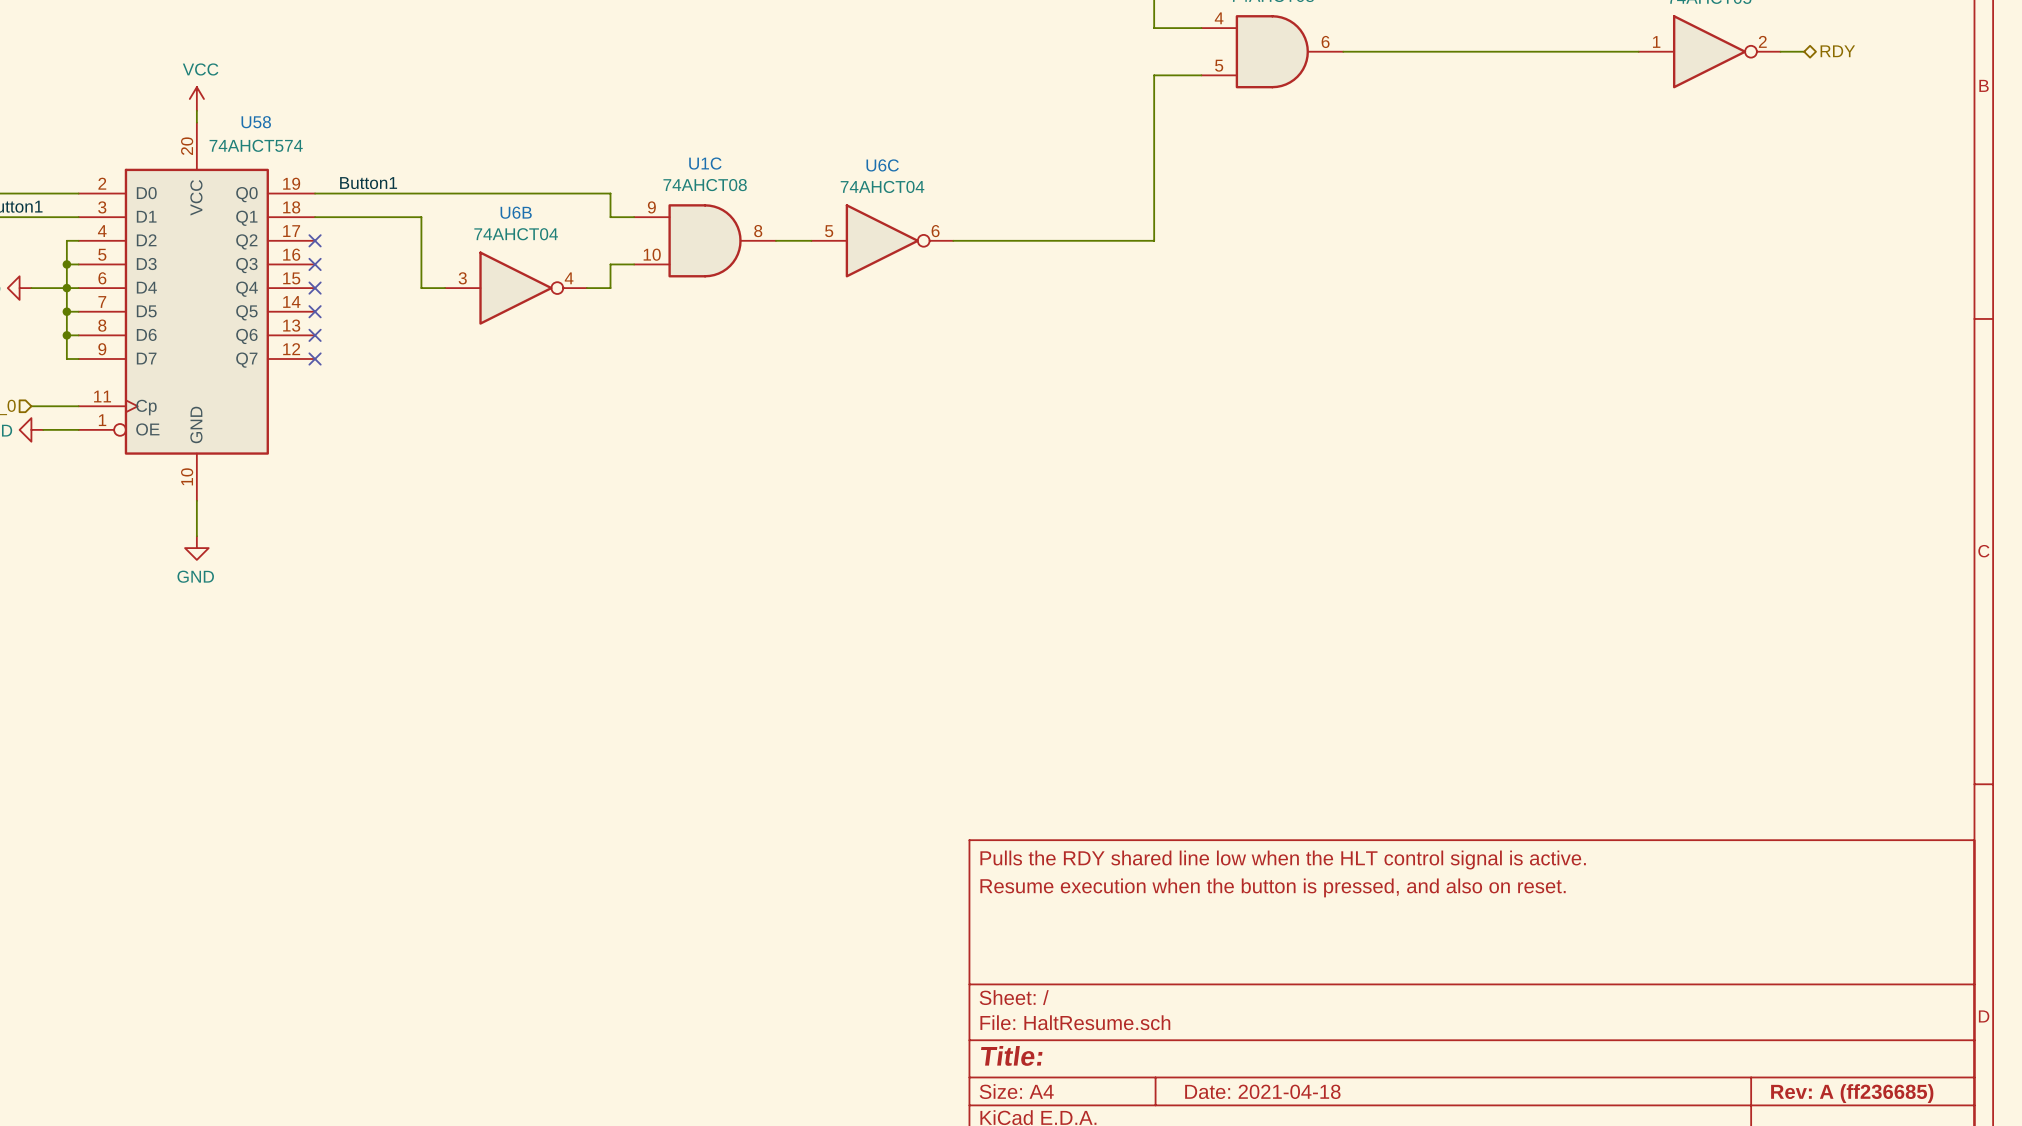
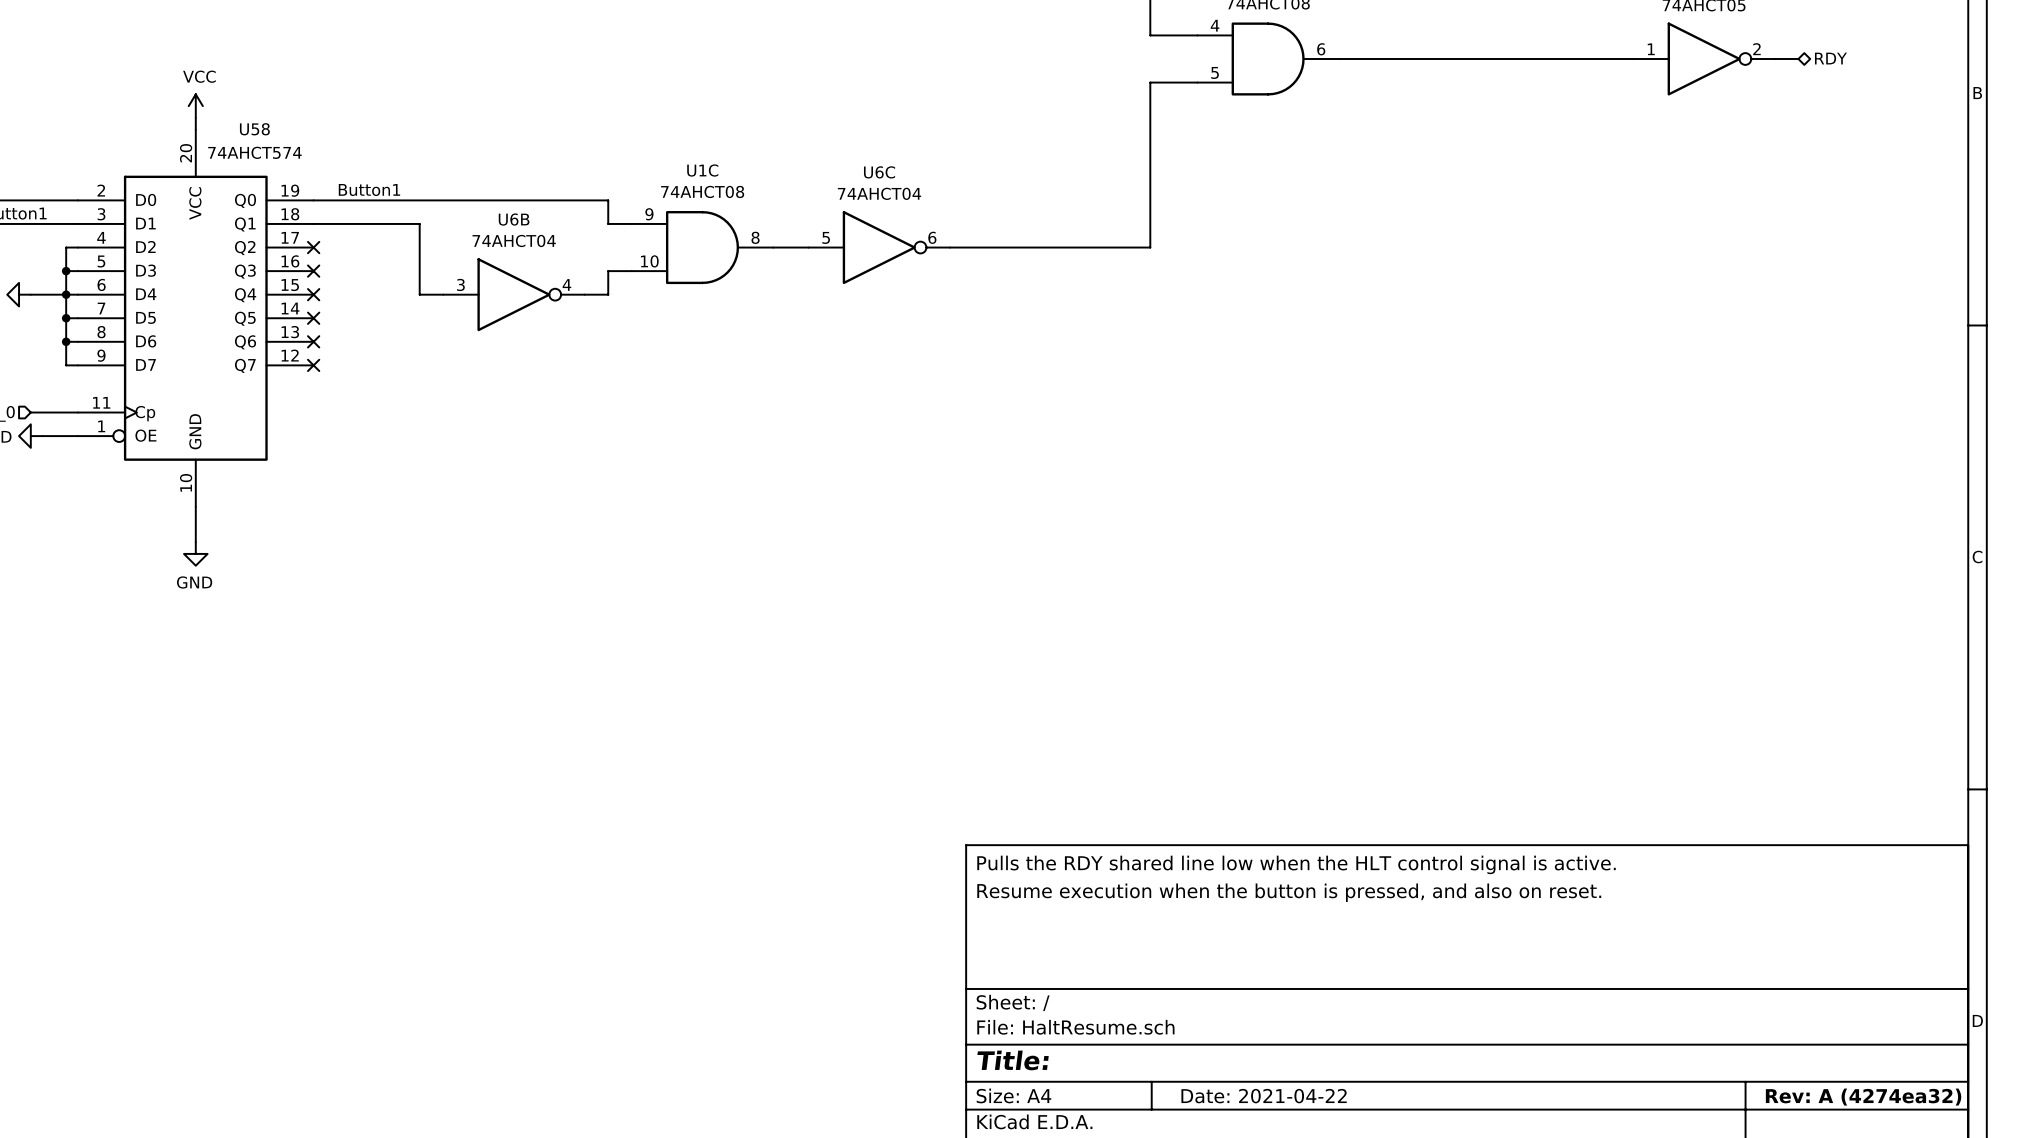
title block: Date: 2021-04-18 (1262, 1091) -> Date: 2021-04-22 (1264, 1096)
title block: Rev: A (ff236685) (1852, 1093) -> Rev: A (4274ea32) (1863, 1097)

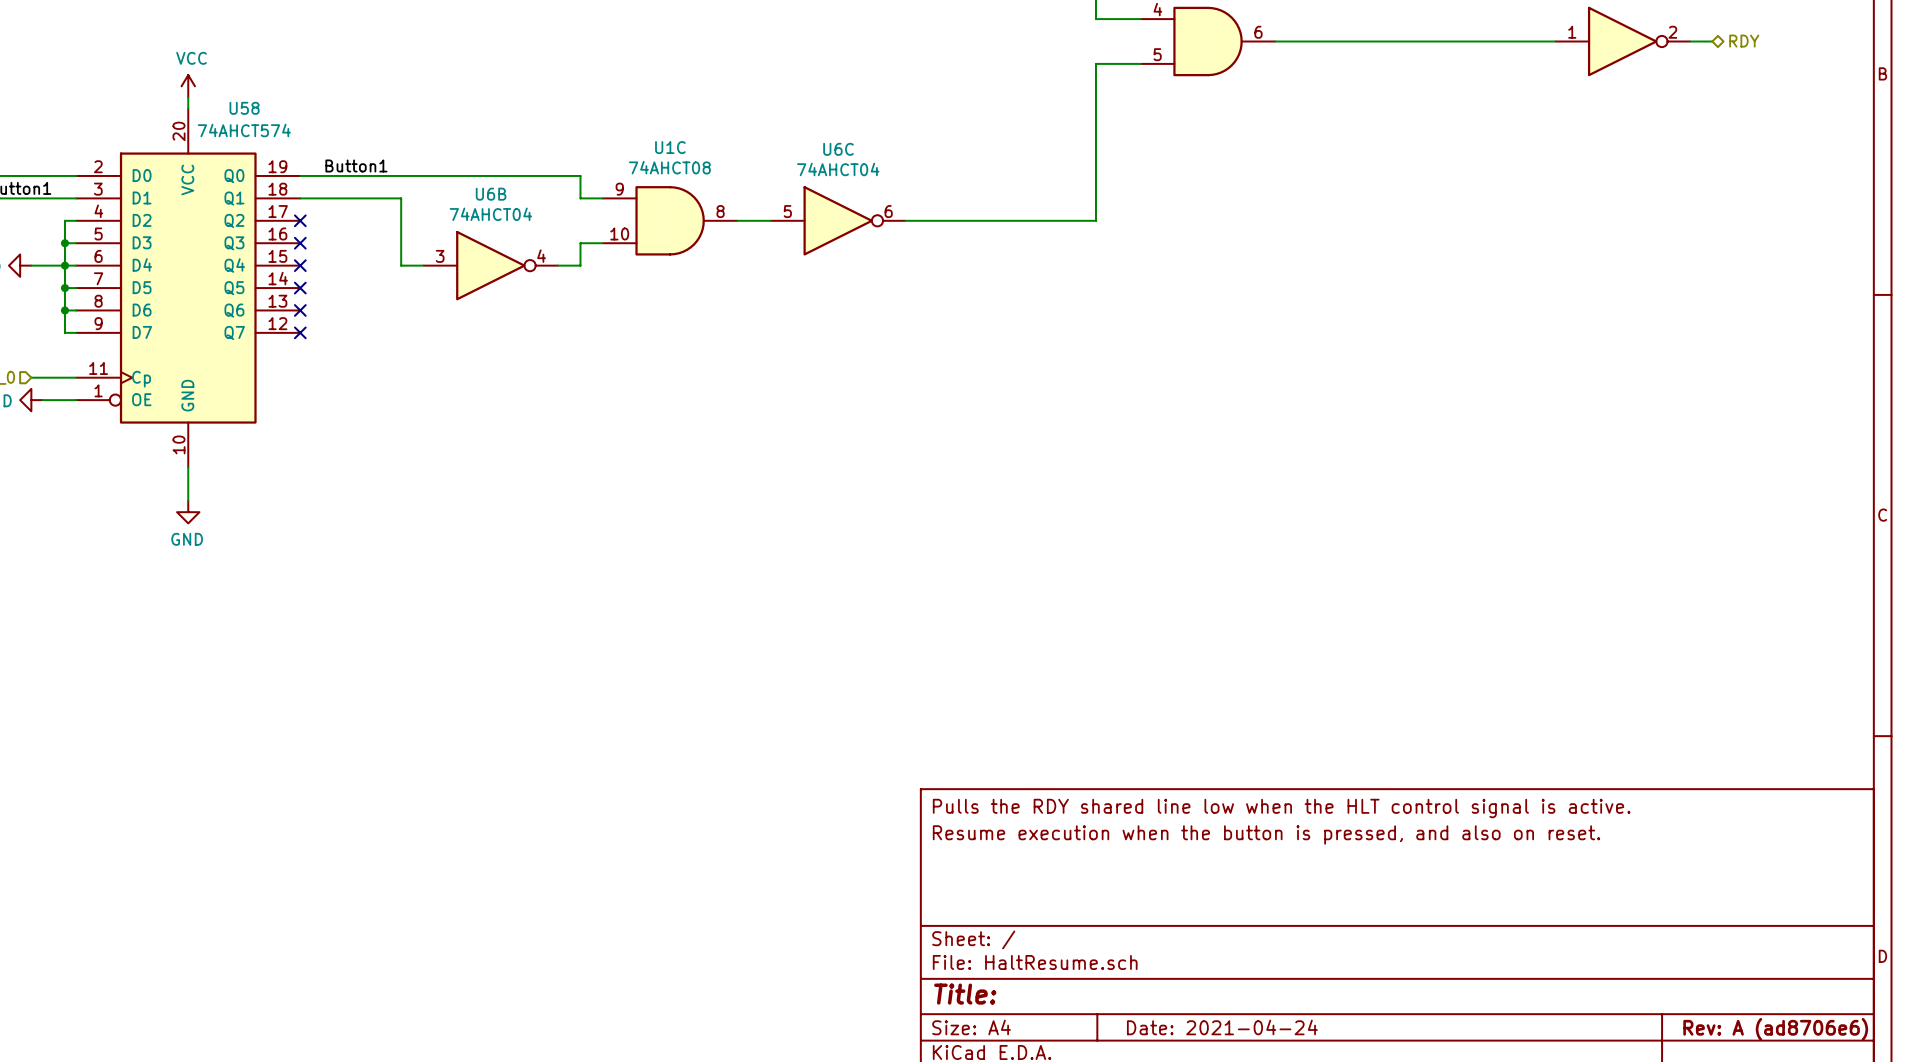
title block: Date: 2021-04-22 (1264, 1096) -> Date: 2021-04-24 (1222, 1027)
title block: Rev: A (4274ea32) (1863, 1097) -> Rev: A (ad8706e6) (1775, 1029)

